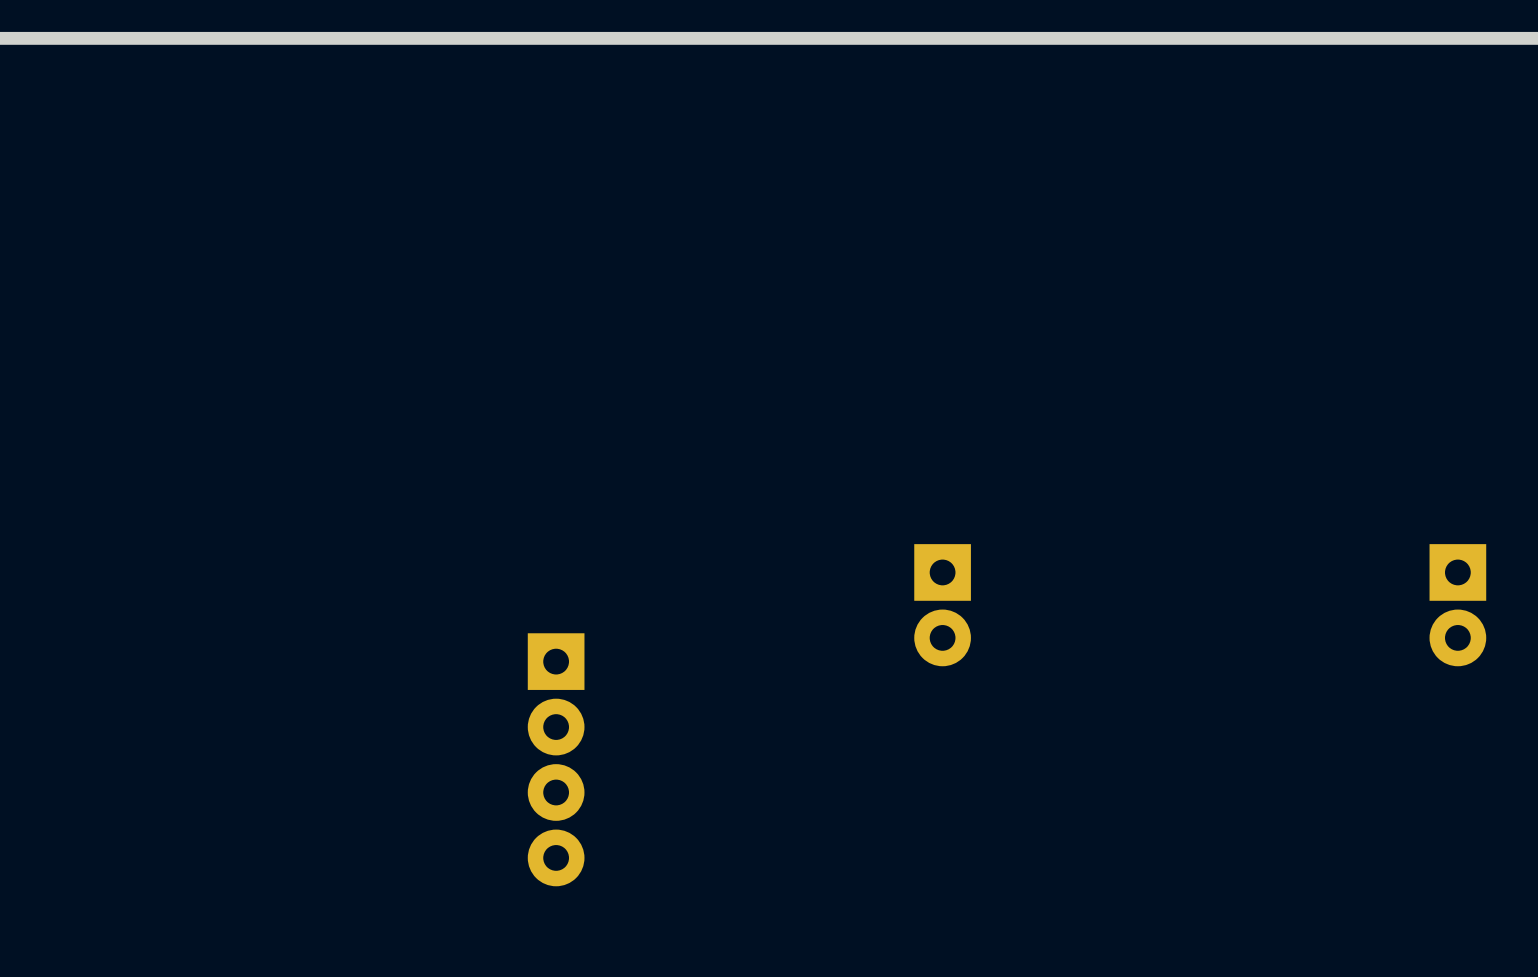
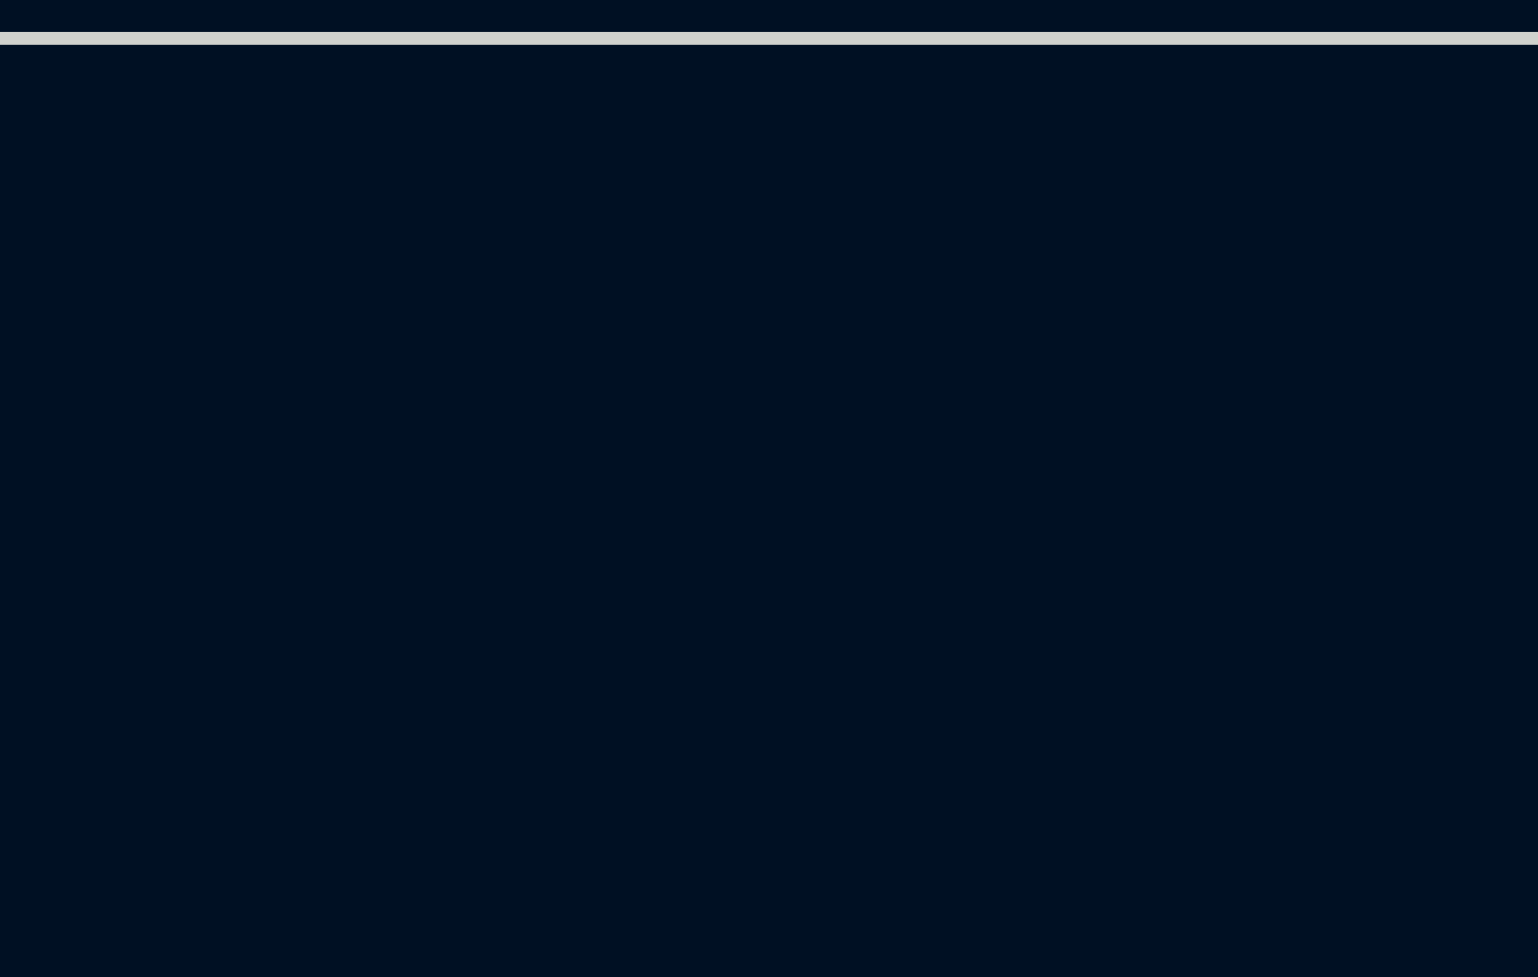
part: (942, 605) -> none
part: (1457, 605) -> none
part: (556, 759) -> none

